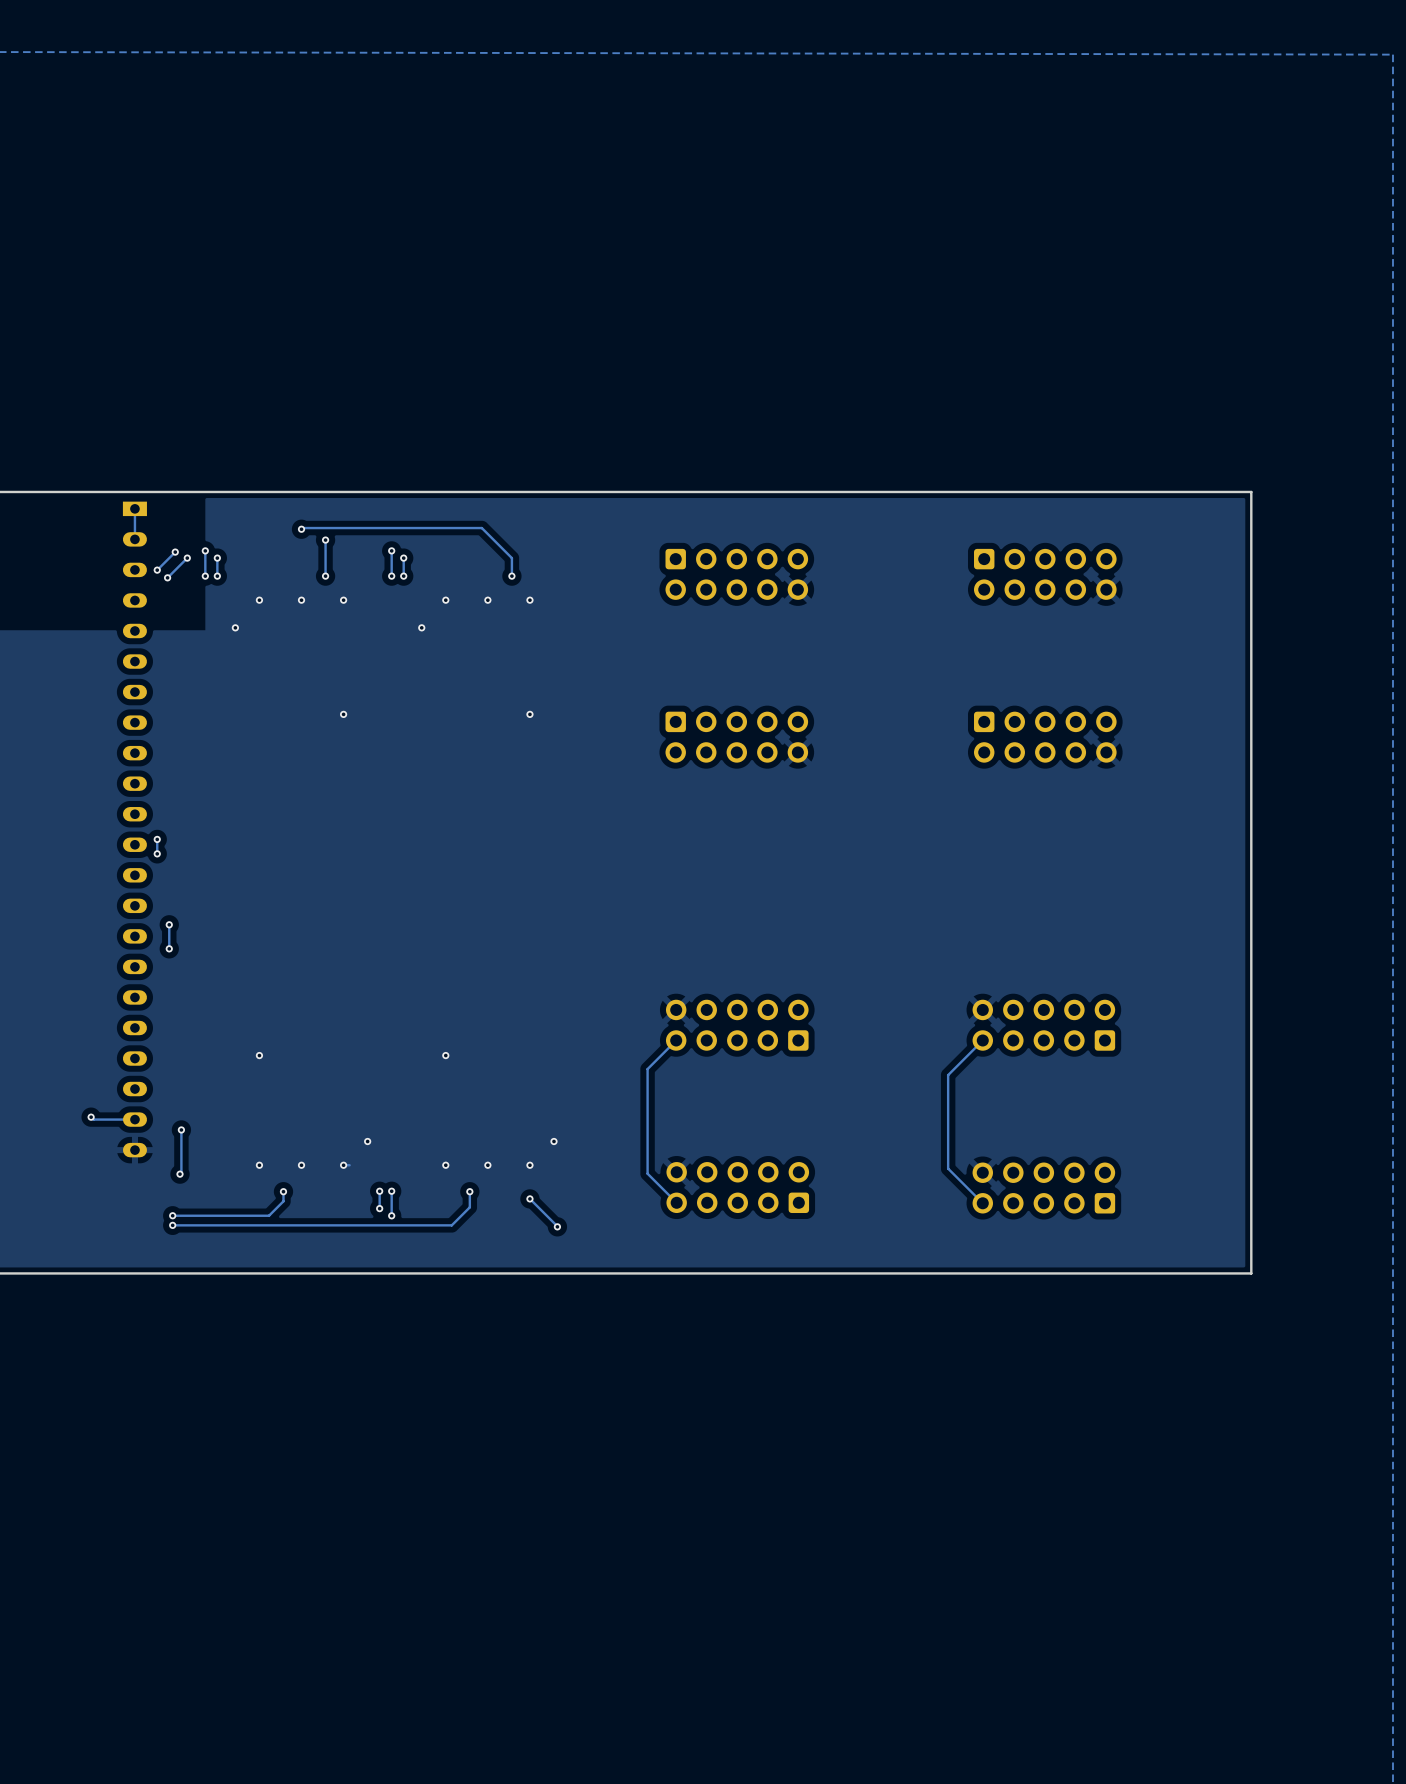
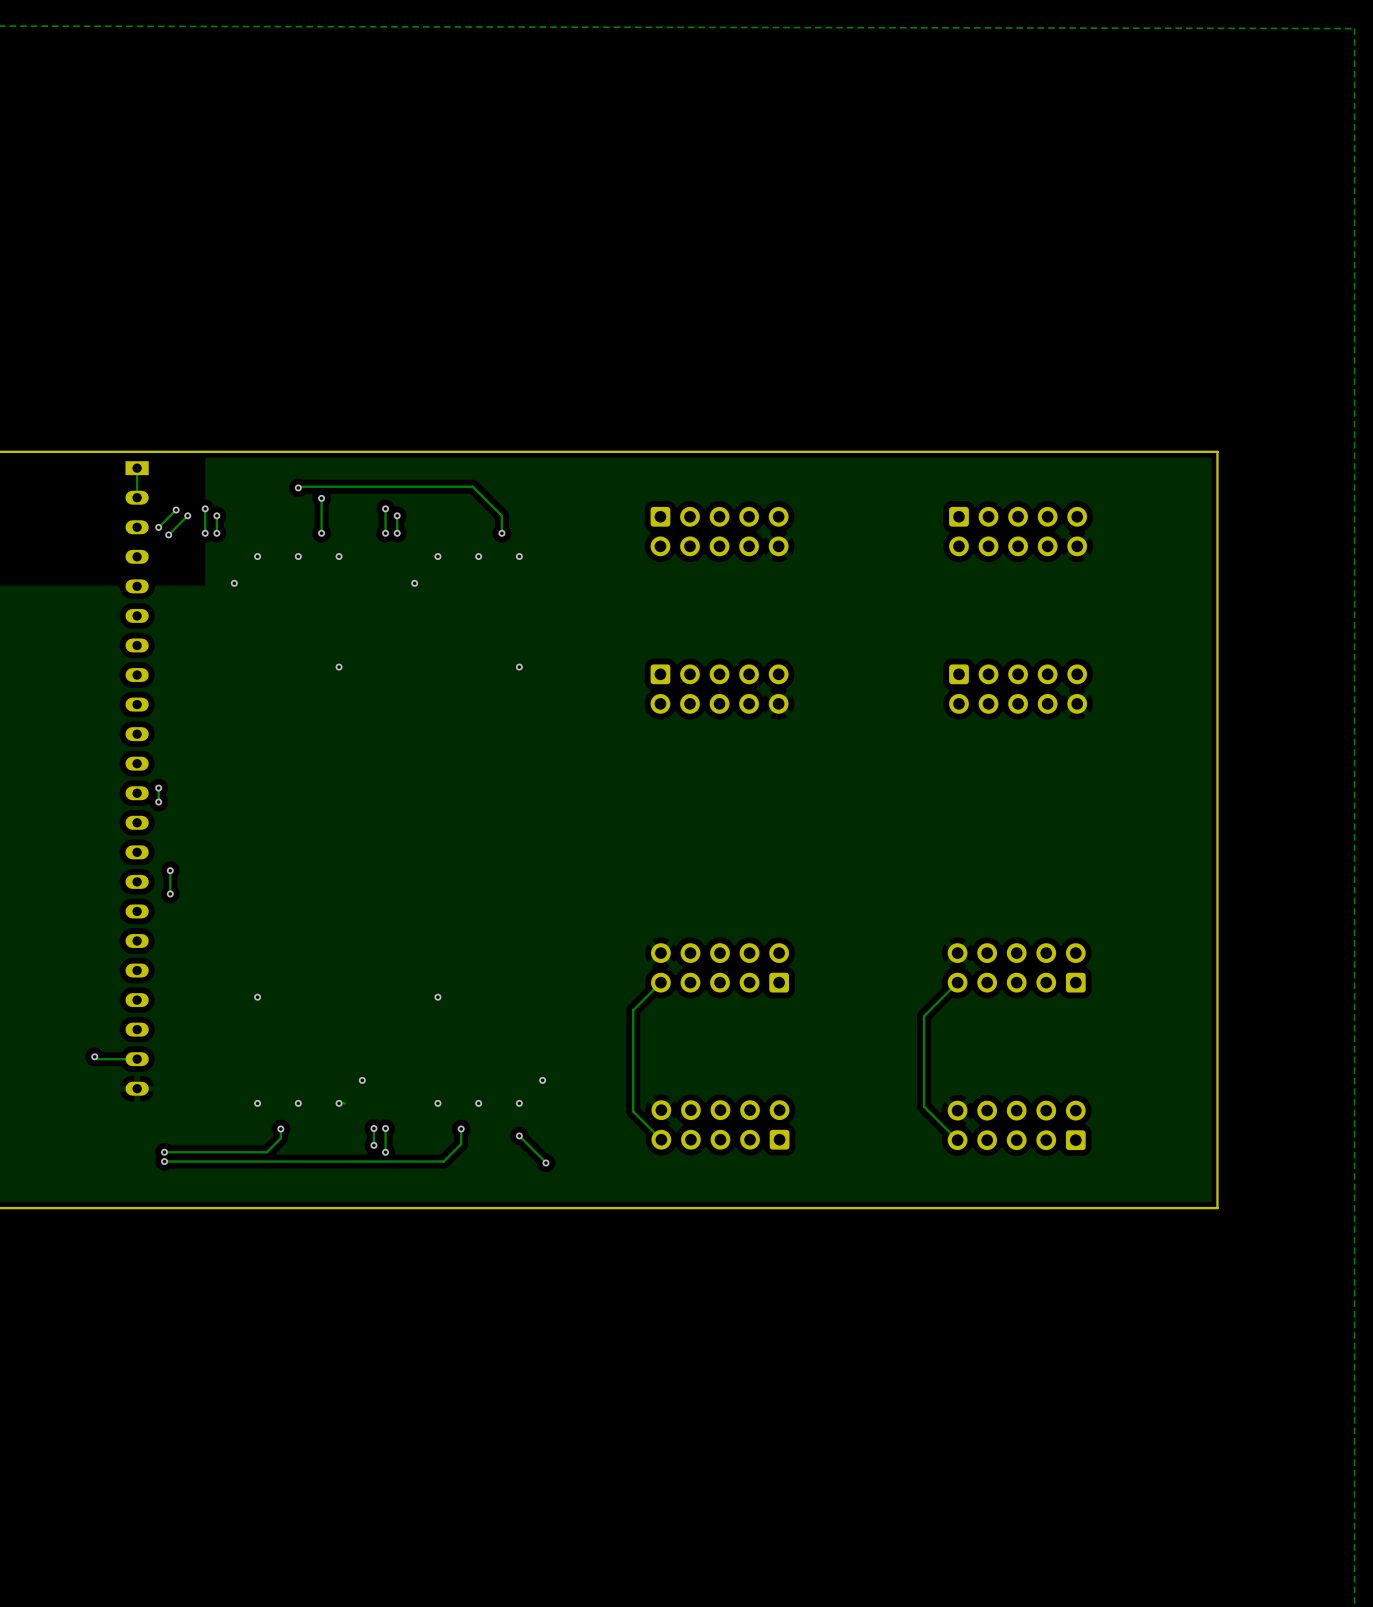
track: (181, 1129) (179, 1174) -> none
via: (181, 1129) -> none
via: (179, 1174) -> none
via: none -> (164, 1152)
track: none -> (173, 1152) (164, 1152)
via: (172, 1215) -> none
via: none -> (164, 1161)
track: none -> (173, 1161) (164, 1161)
via: (172, 1225) -> none

